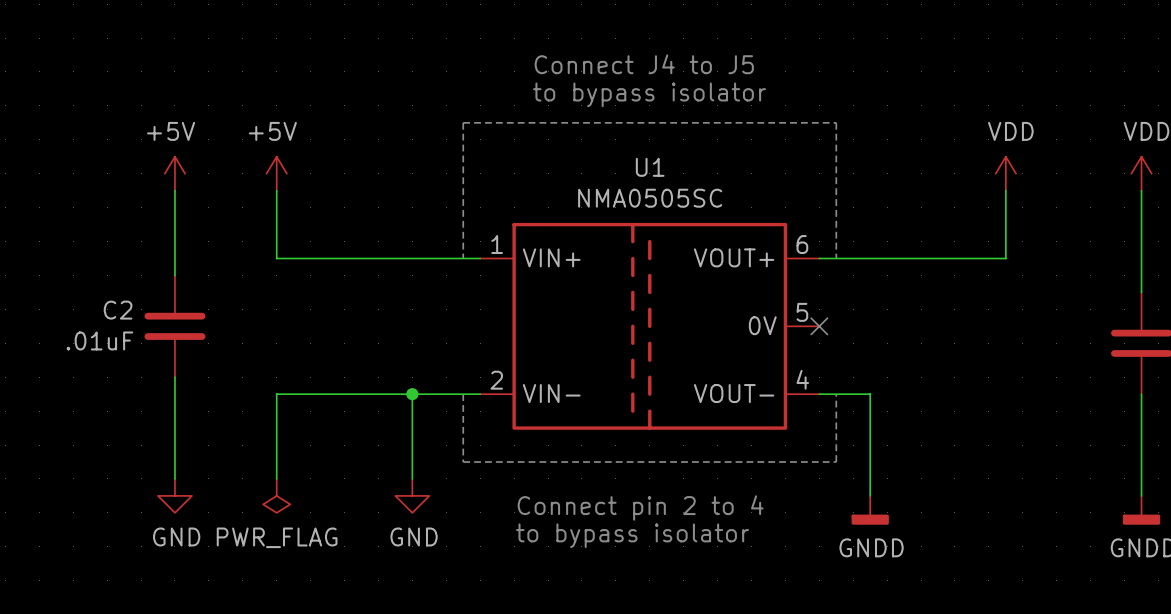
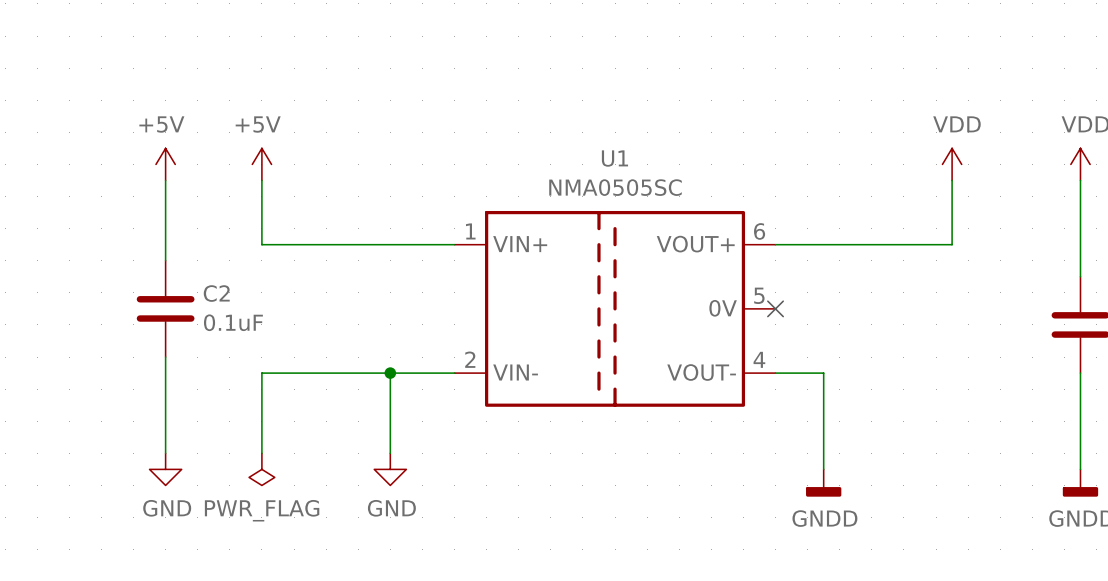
text: Connect J4 to J5 (644, 64) -> none
text: to bypass isolator (649, 94) -> none
line: (463, 258) (463, 122) (836, 122) (836, 258) -> none
C2 name position: C2 (118, 310) -> C2 (216, 293)
C2 value: .01uF (99, 340) -> 0.1uF (233, 322)
line: (463, 394) (463, 462) (836, 462) (836, 394) -> none
text: Connect pin 2 to 4 (640, 508) -> none
text: to bypass isolator (632, 535) -> none

